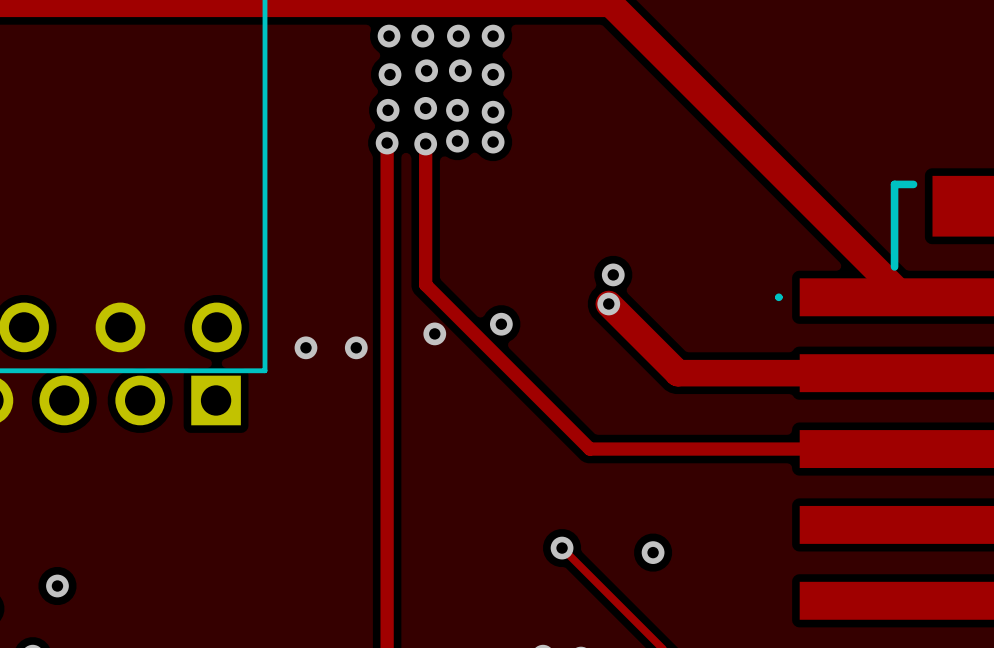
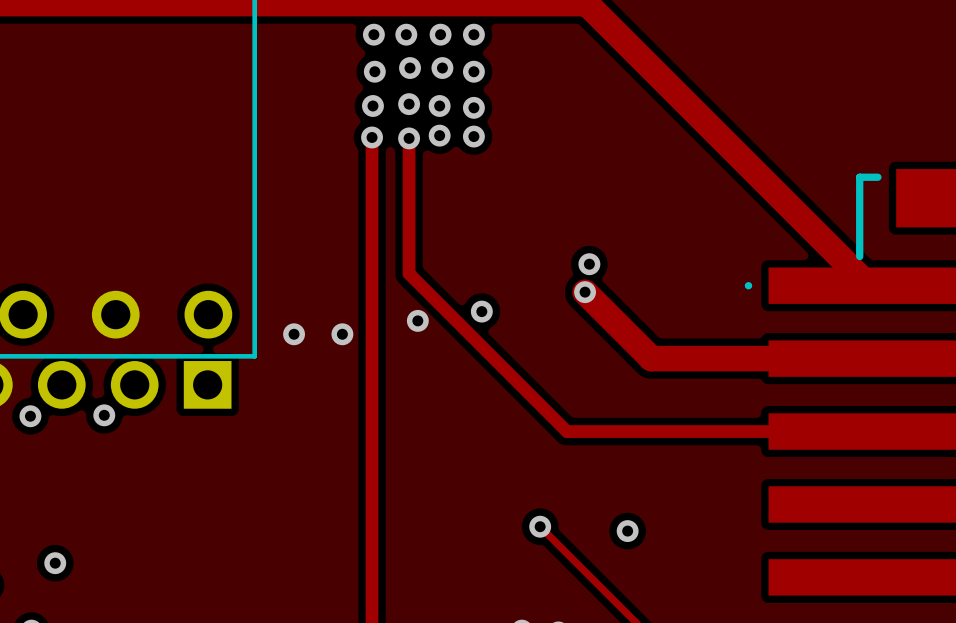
via: none -> (104, 415)
via: none -> (30, 416)

